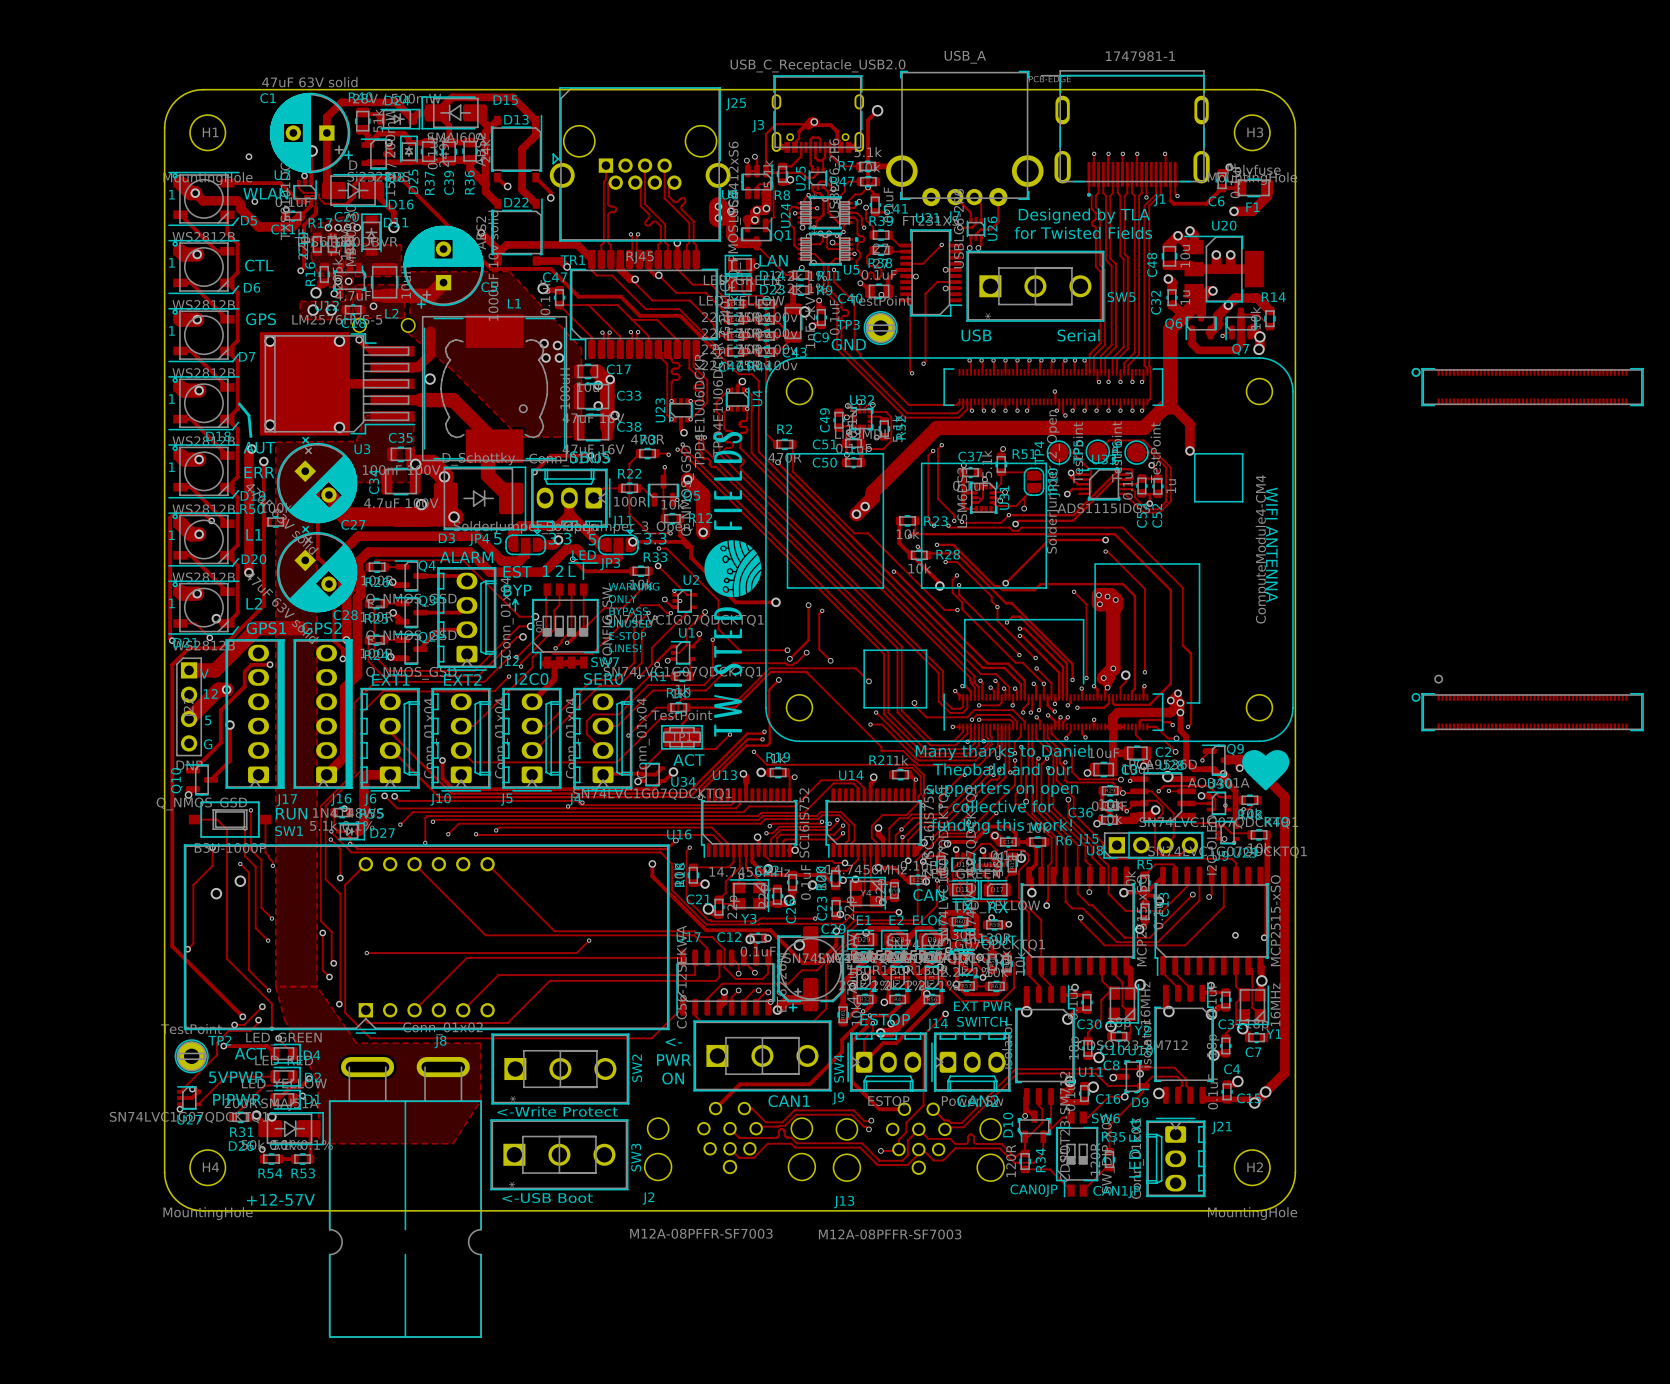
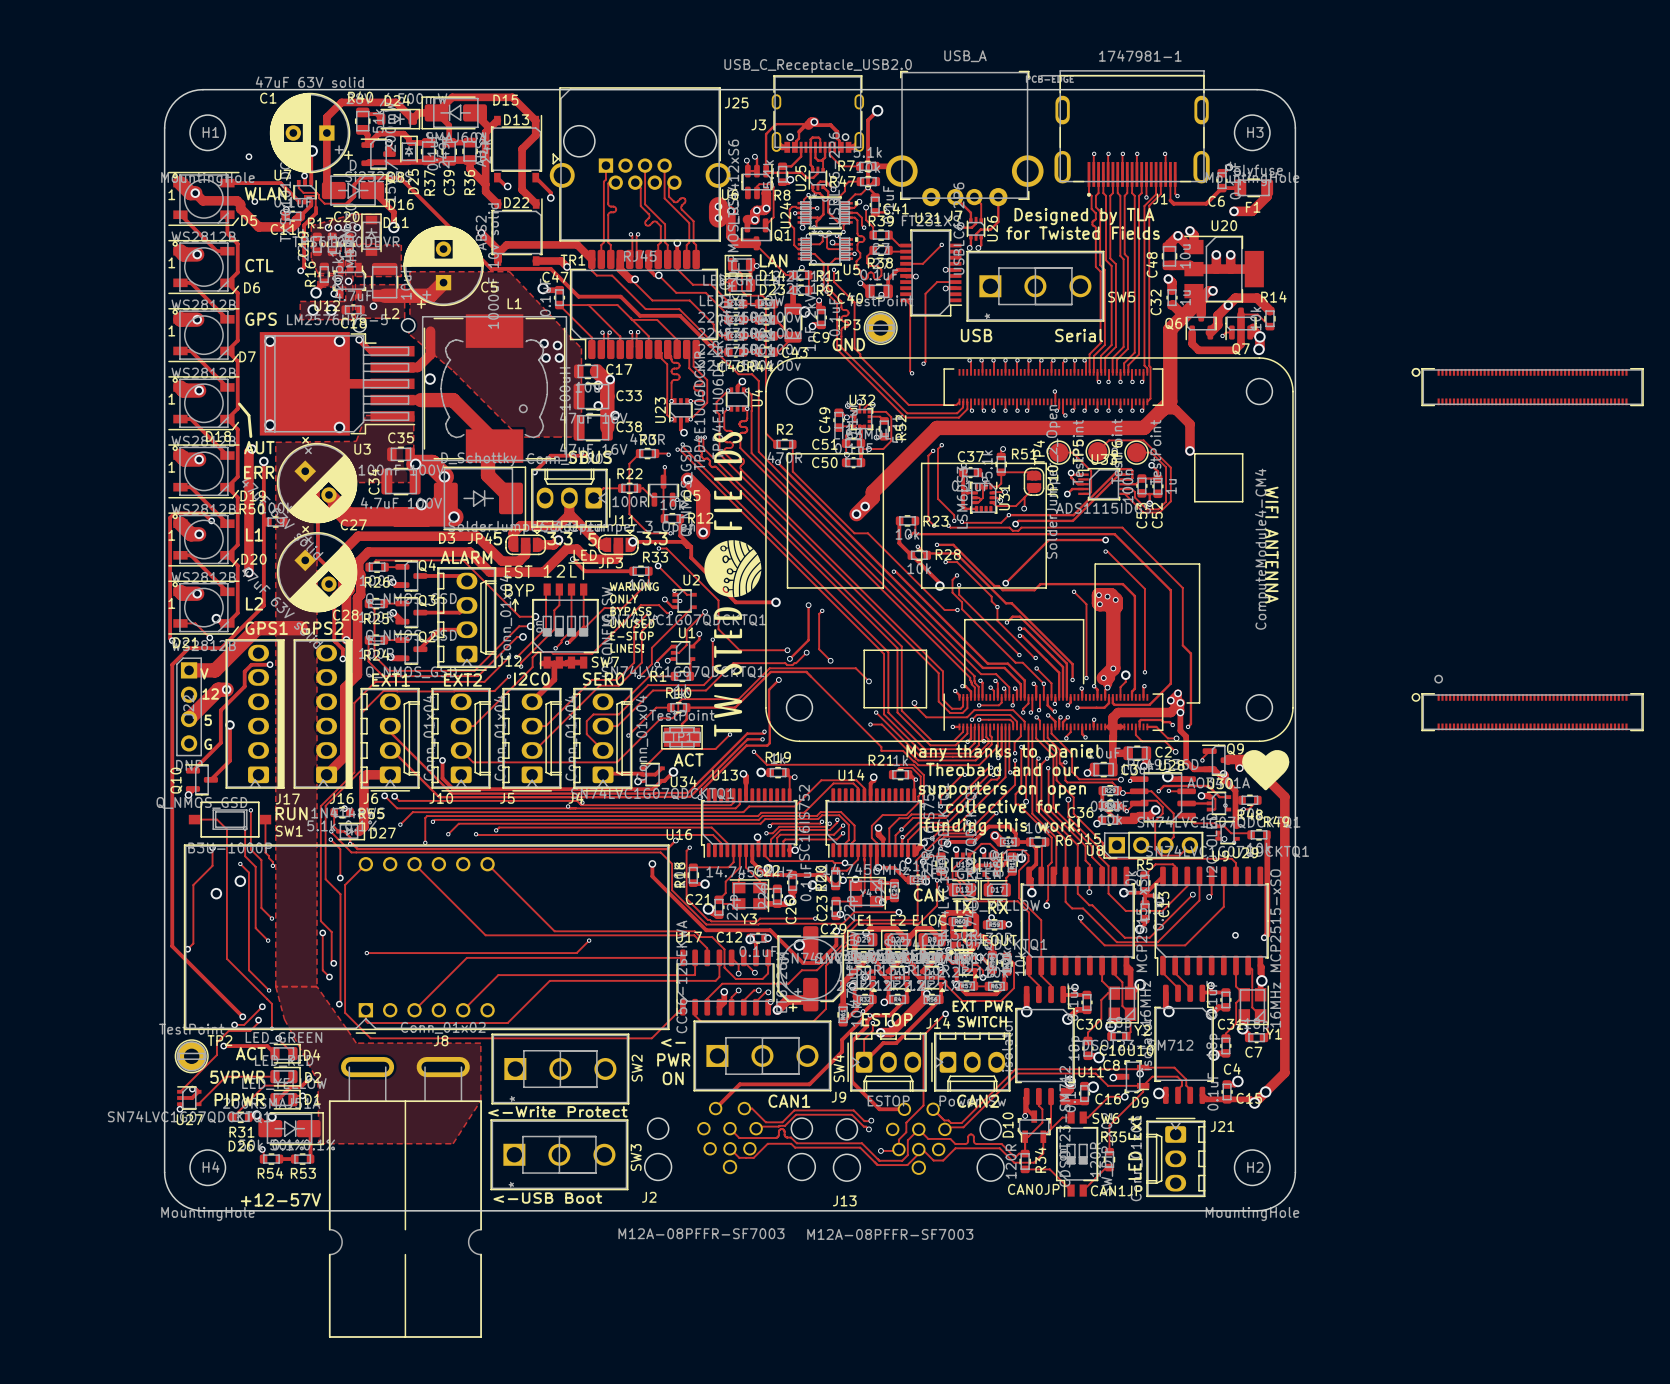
C53 value: 0.1u (1127, 486) -> 100n (1127, 486)

